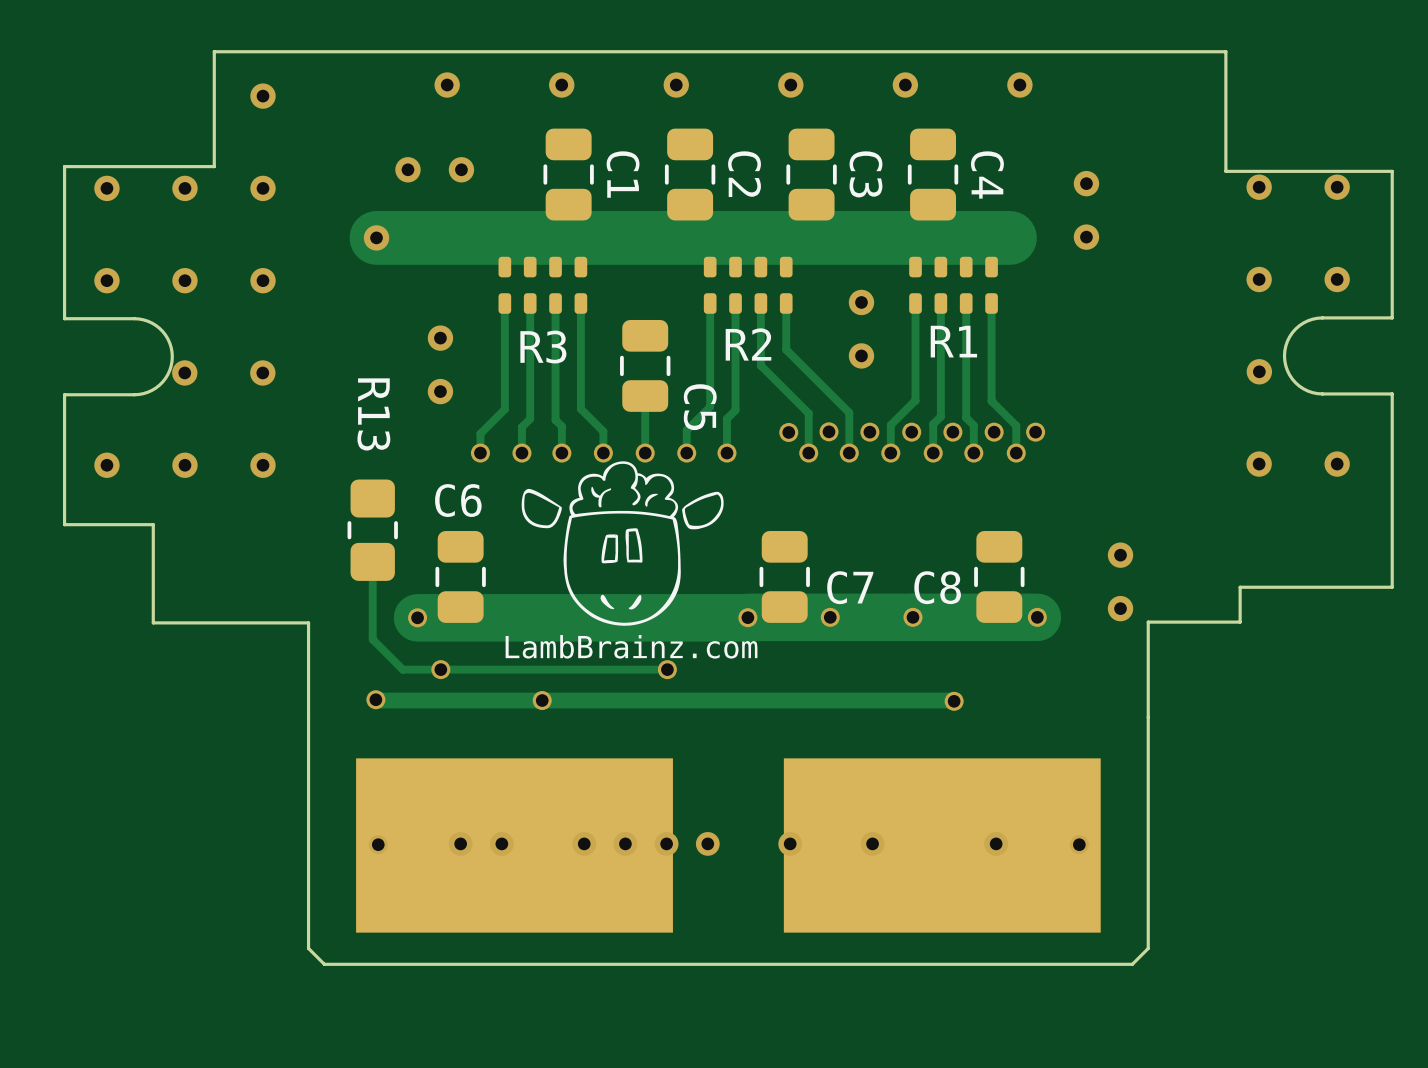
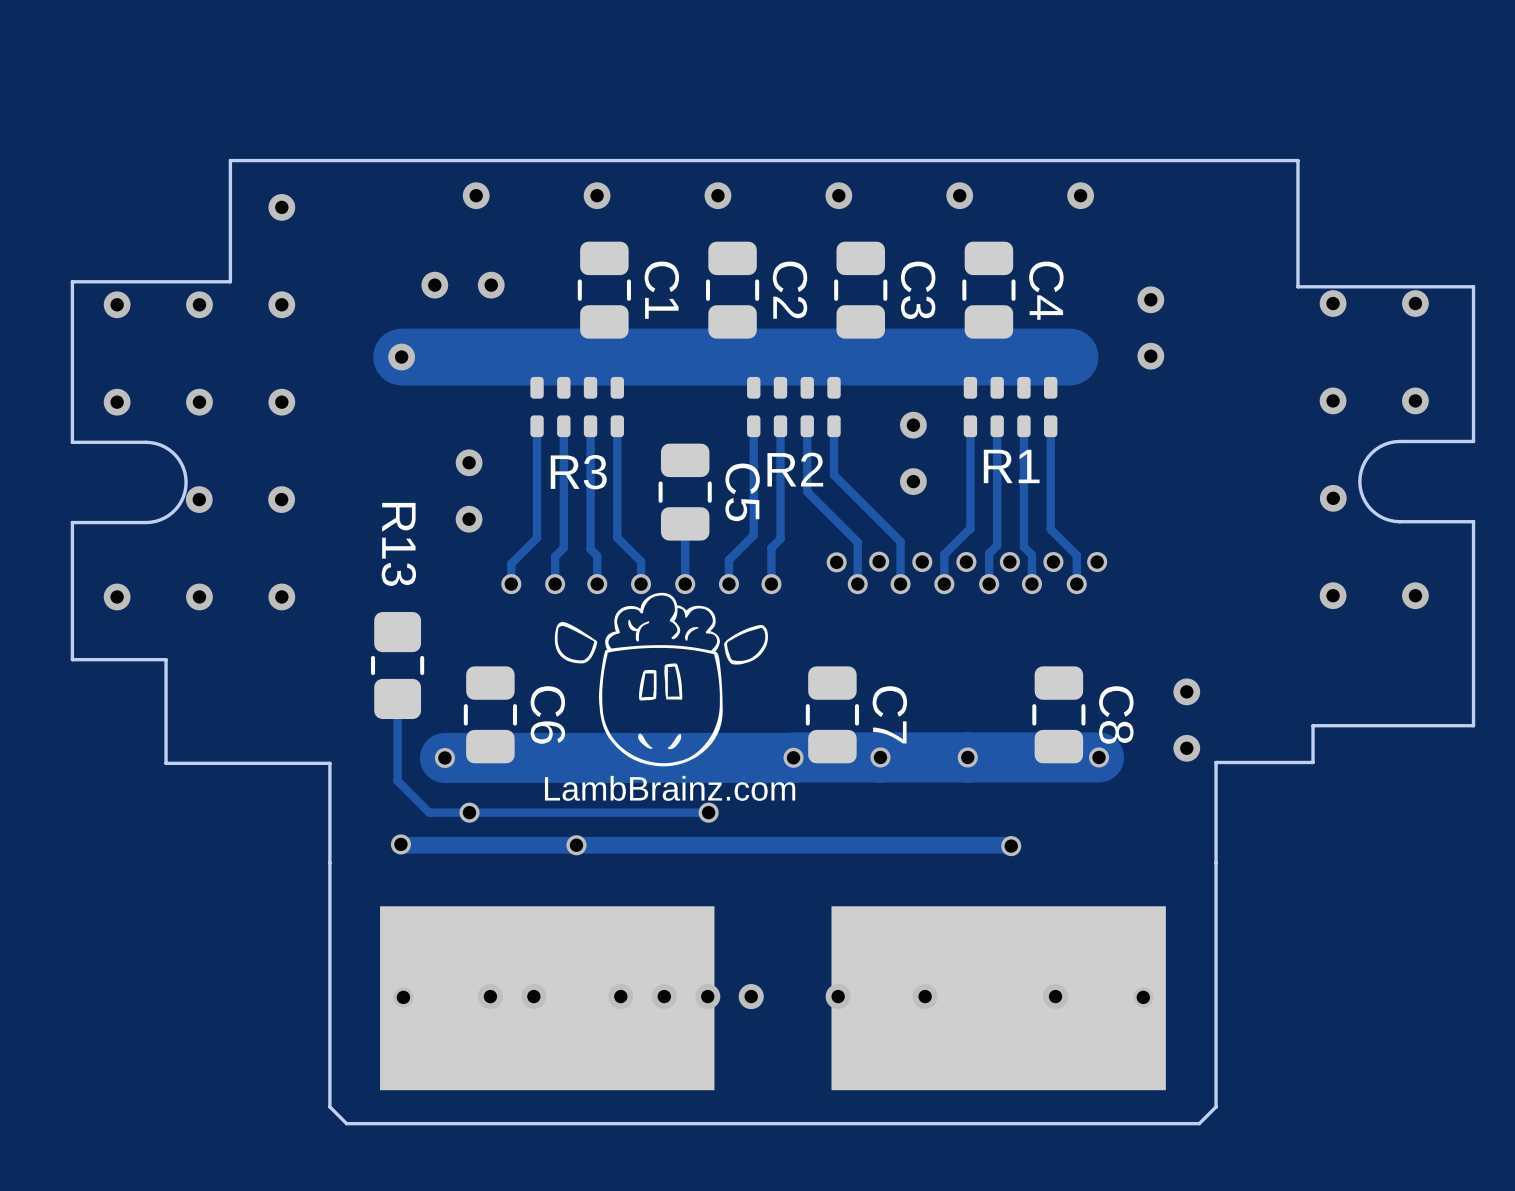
C5 name position: C5 (700, 407) -> C5 (742, 492)
C6 name rotation: 0° (458, 500) -> 90° clockwise (547, 715)
C6 name position: C6 (458, 500) -> C6 (547, 715)
C7 name rotation: 0° (850, 587) -> 90° clockwise (889, 714)
C8 name rotation: 0° (937, 587) -> 90° clockwise (1116, 715)
C8 name position: C8 (937, 587) -> C8 (1116, 715)

